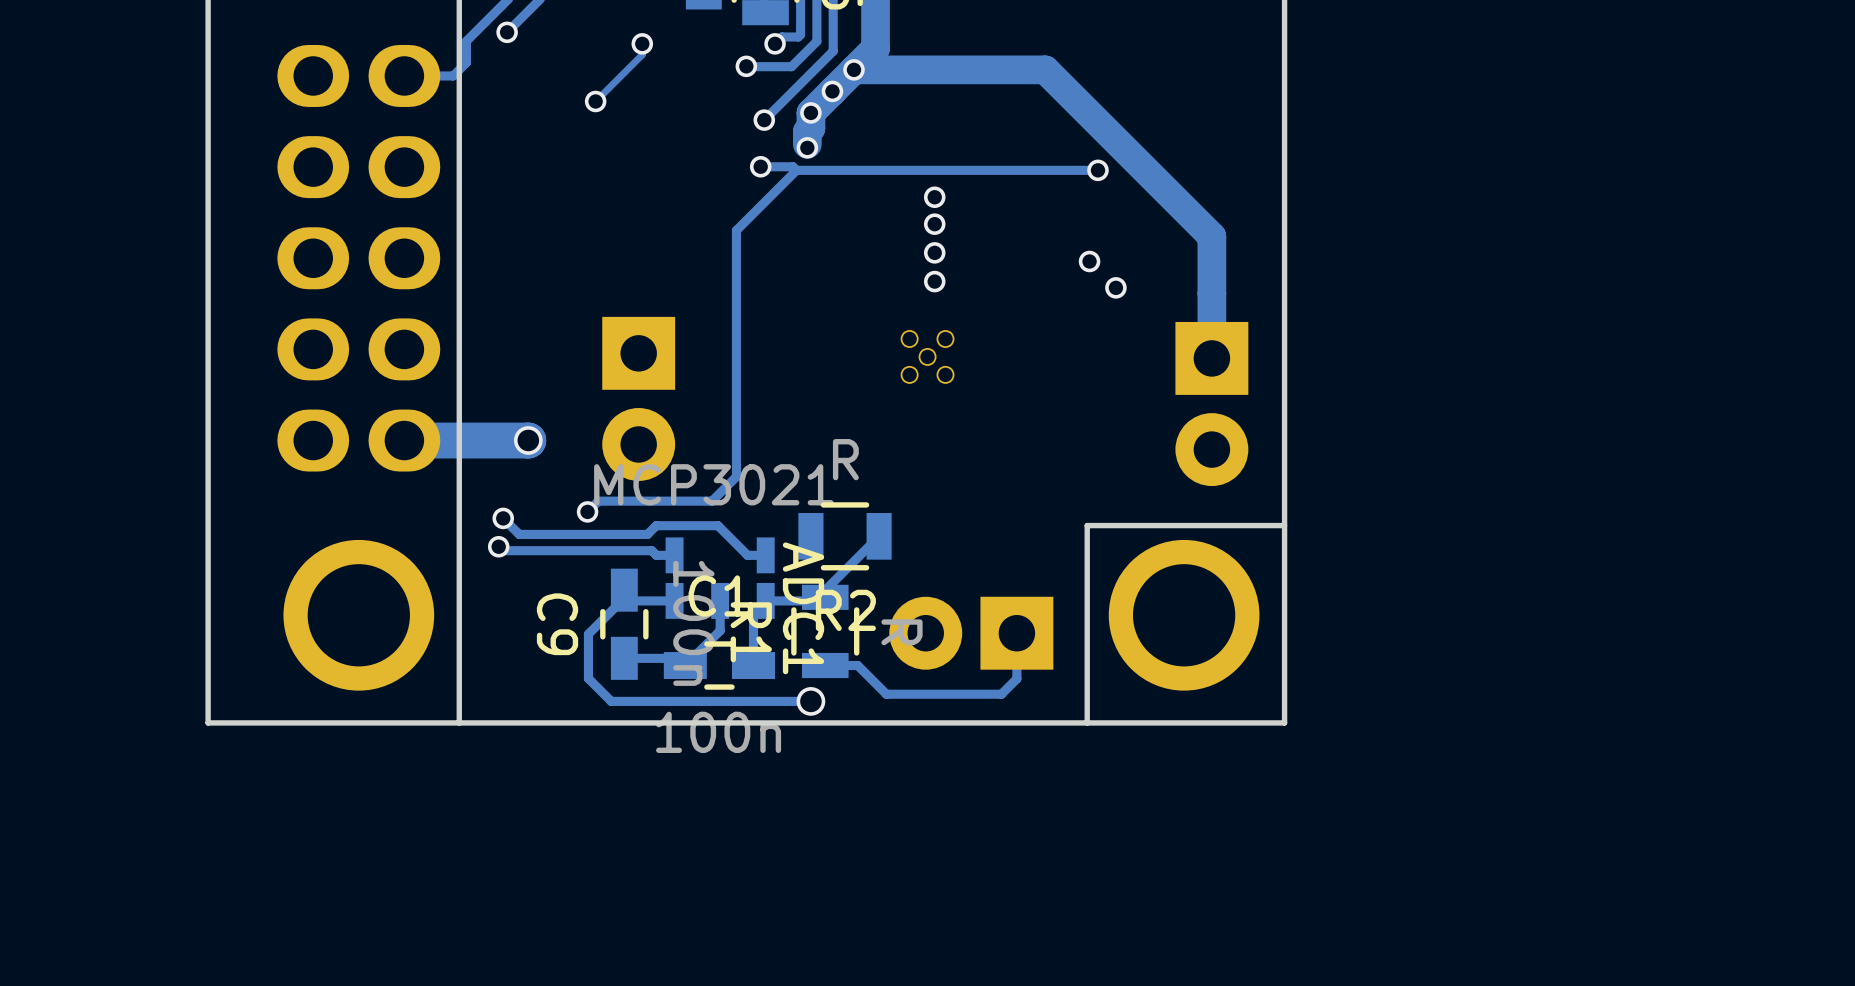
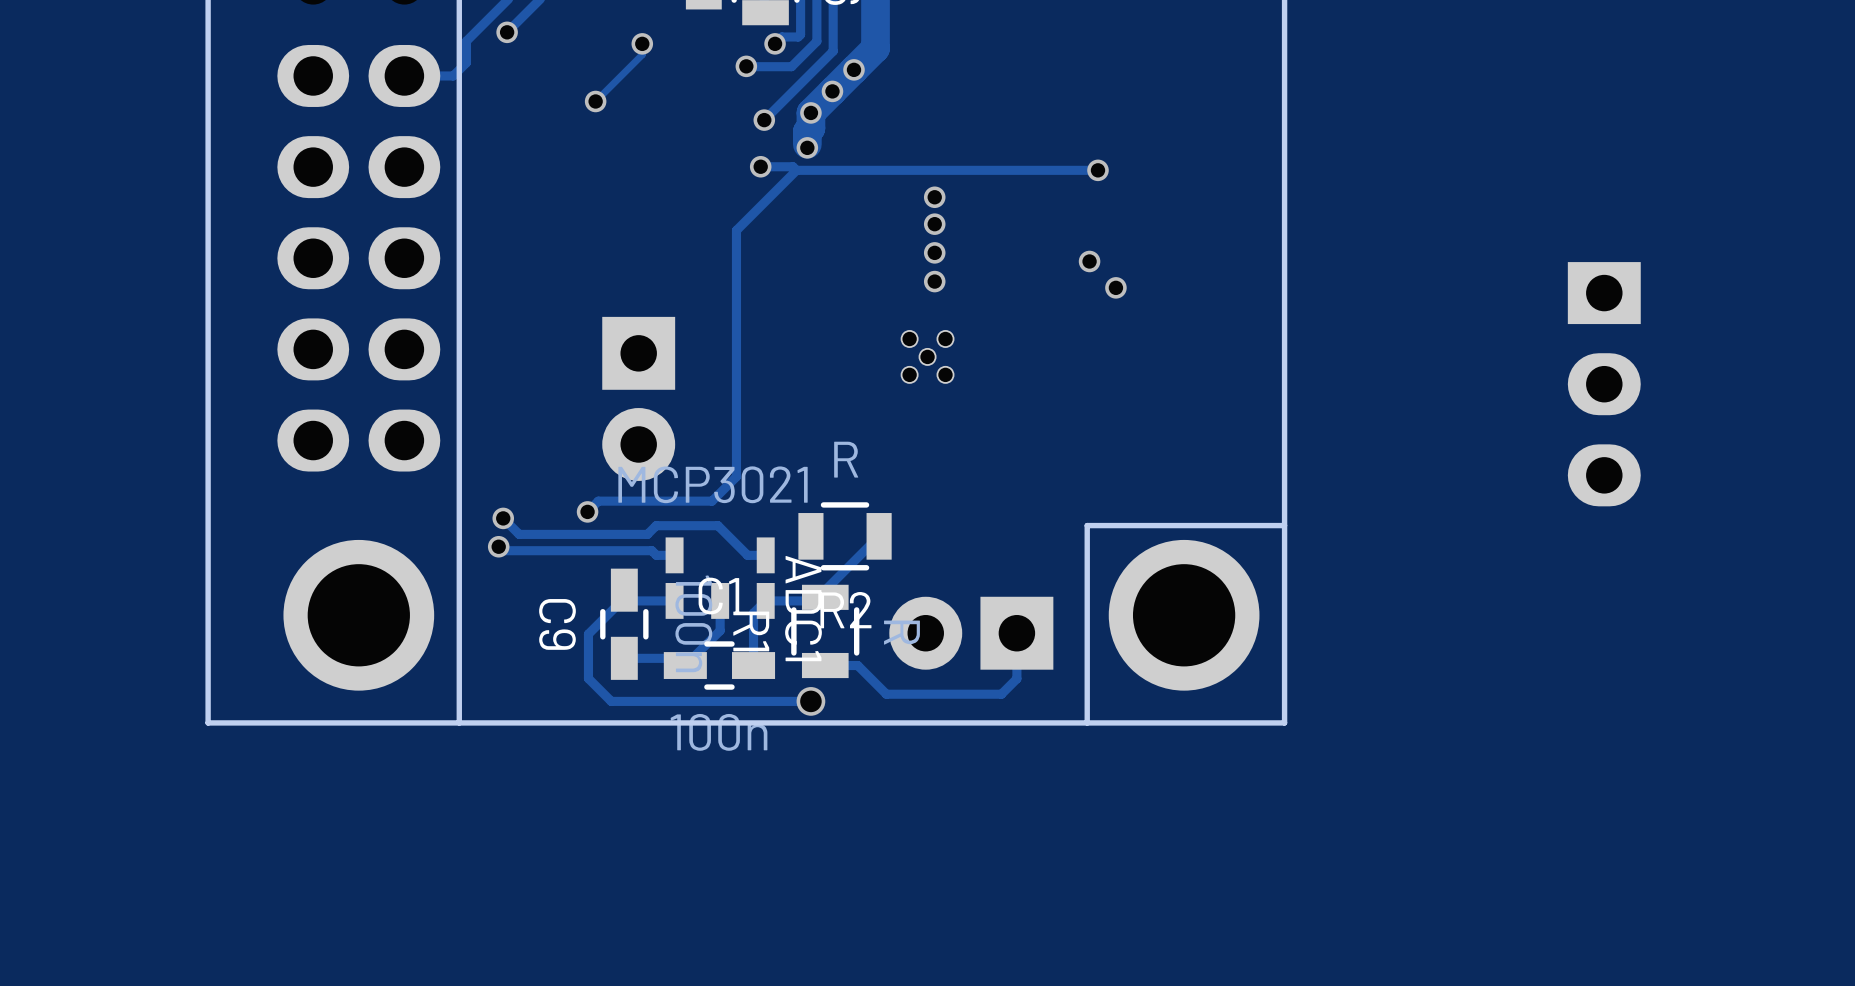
track: (853, 69) (1045, 69) (1211, 236) (1211, 358) -> none
part: none -> (1604, 384)
part: (1211, 404) -> none
track: (528, 440) (404, 440) -> none
via: (528, 440) -> none

